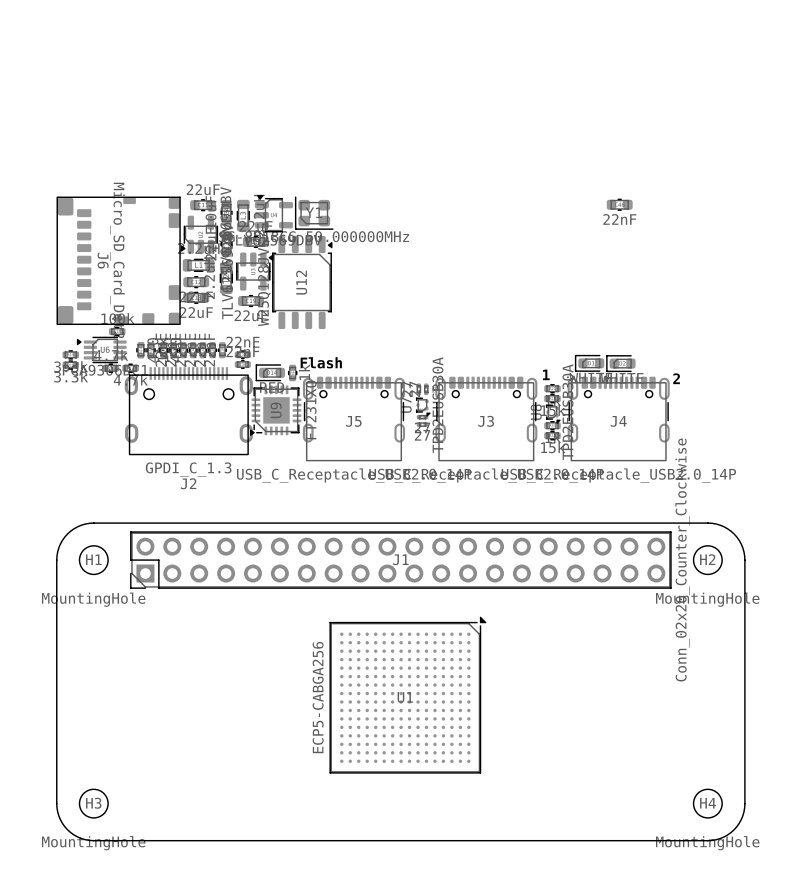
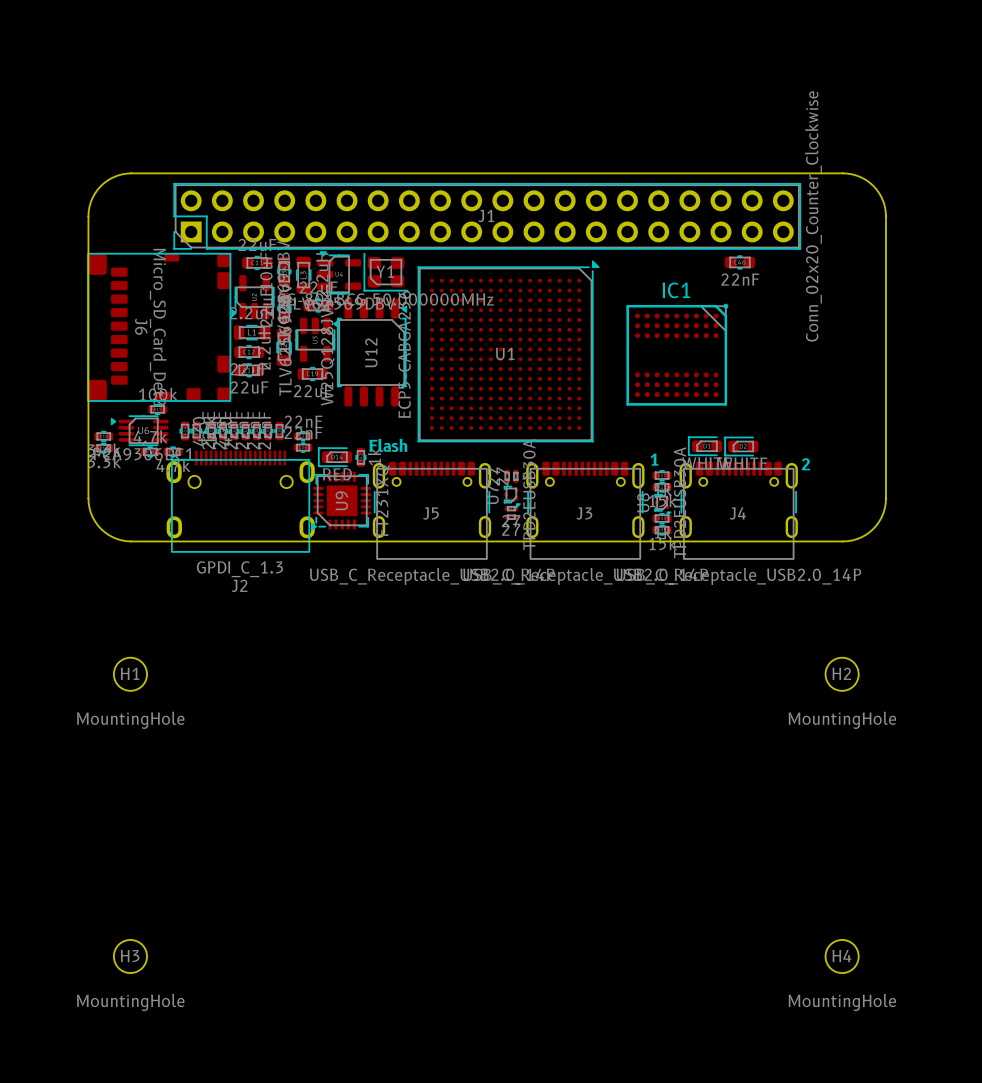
board edge: none -> (131, 173) (843, 173) (861, 177) (876, 189) (883, 202) (885, 211) (885, 498) (881, 517) (876, 525) (865, 534) (852, 540) (843, 541) (131, 541) (112, 537) (101, 528) (95, 521) (88, 503) (88, 216) (90, 202) (101, 185) (117, 175) (131, 173)
IC1: none -> (677, 354)
board edge: (93, 523) (707, 523) (723, 526) (736, 537) (744, 555) (744, 803) (741, 819) (727, 835) (707, 840) (93, 840) (77, 837) (62, 823) (56, 807) (56, 560) (60, 544) (67, 533) (81, 525) (93, 523) -> none
J1 position: (400, 560) -> (487, 216)
U1 position: (407, 695) -> (508, 351)

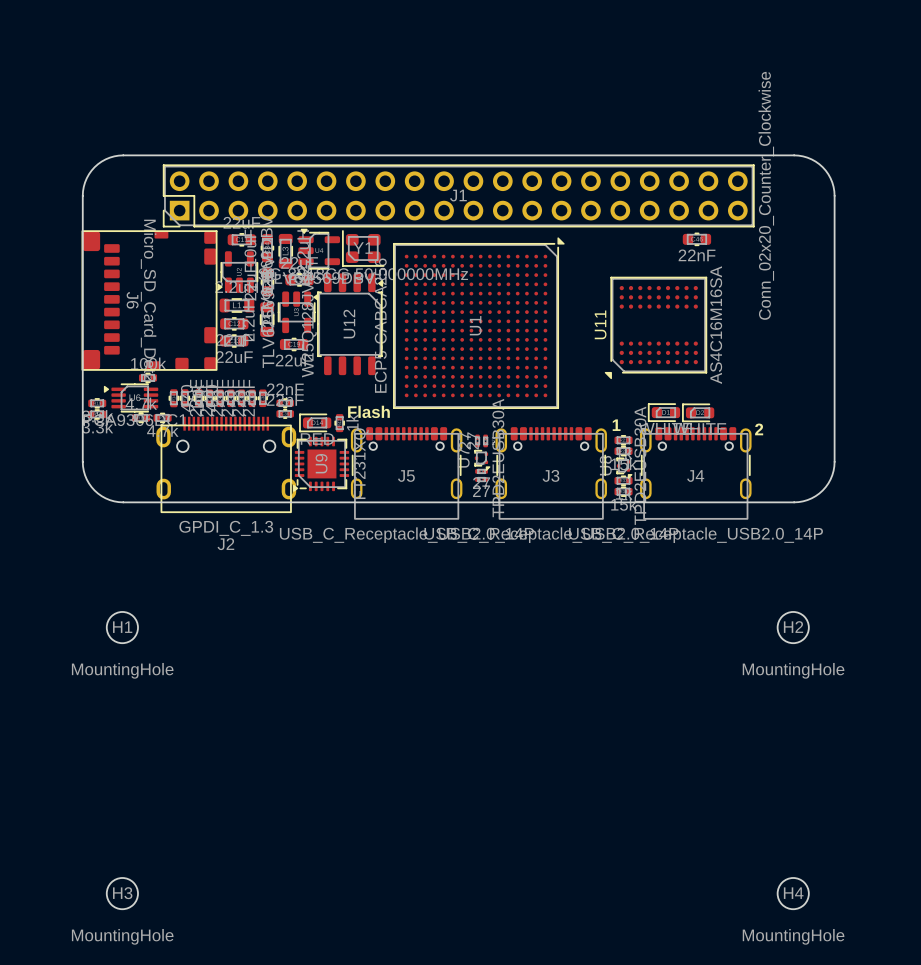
U1 name rotation: 0° (505, 353) -> 90° counterclockwise (475, 325)
IC1: (677, 354) -> none
U11: none -> AS4C16M16SA (655, 328)

